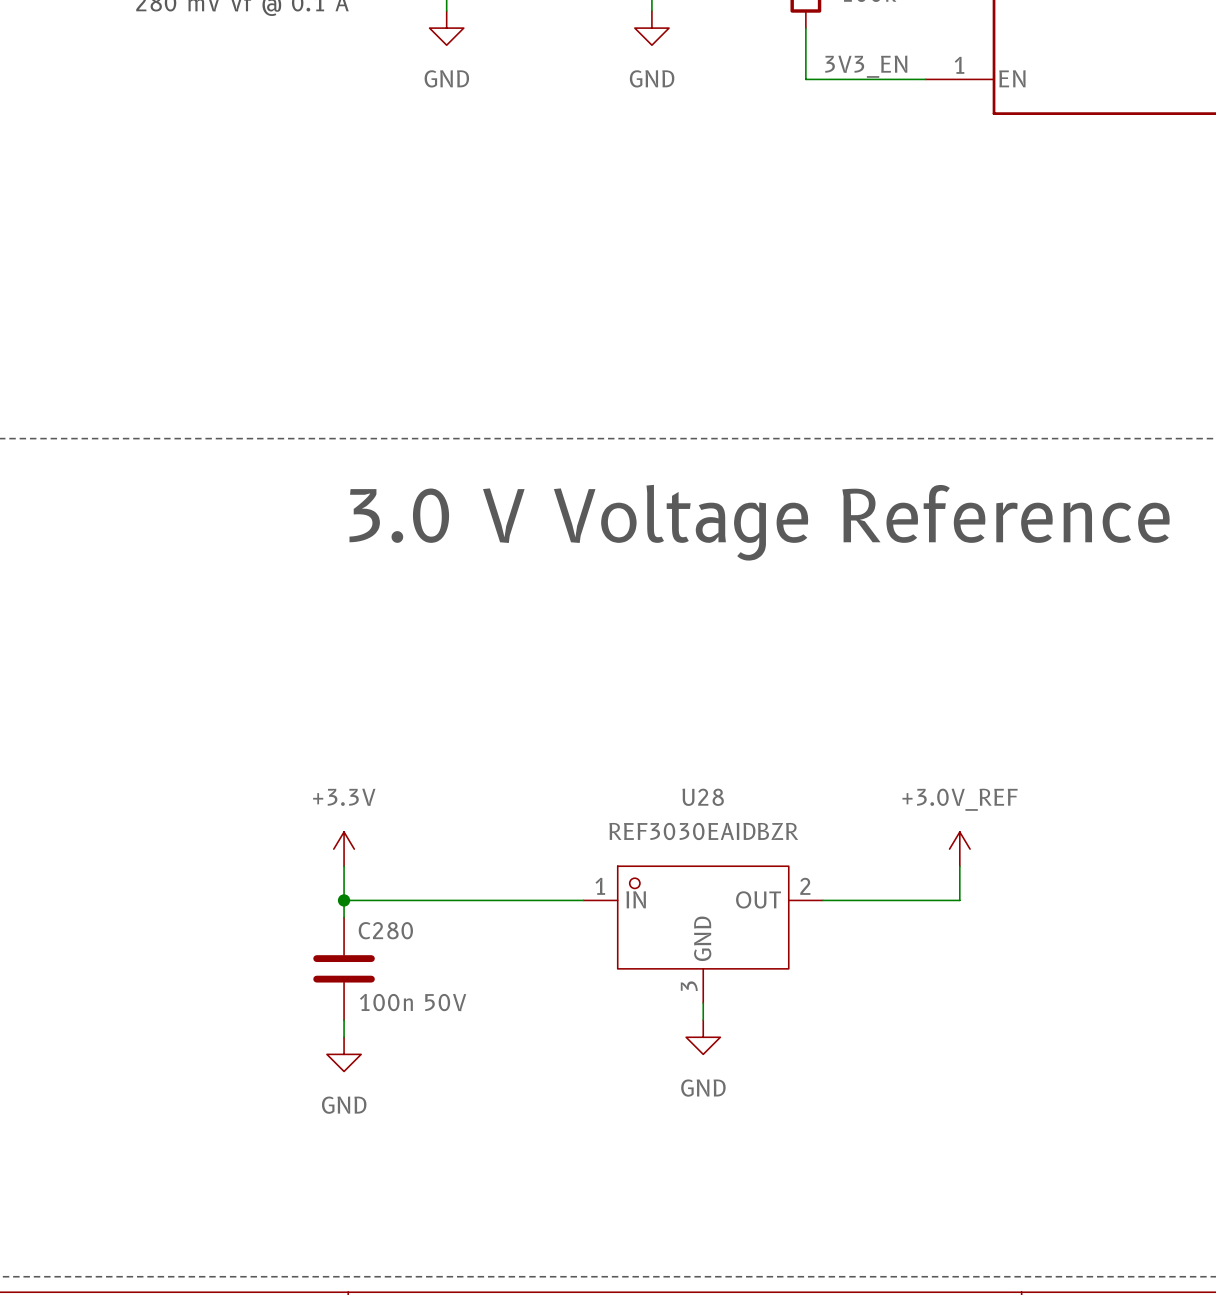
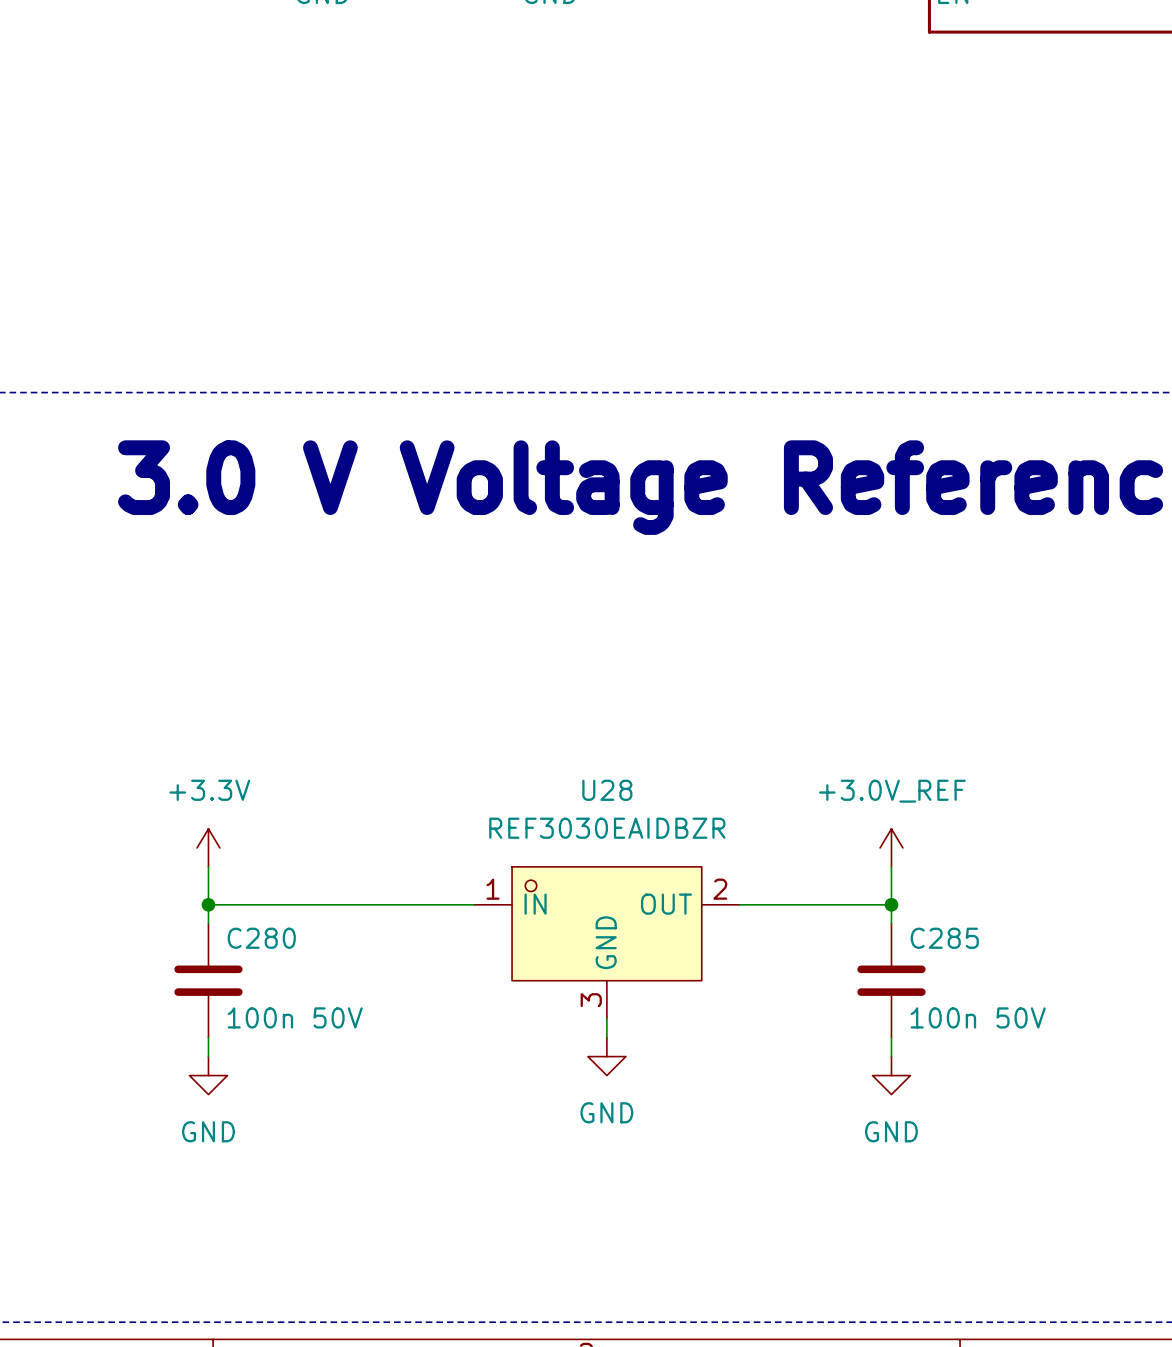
wire: none -> (891, 904) (891, 923)
junction: none -> (891, 904)
C285: none -> 100n 50V (891, 980)
wire: none -> (891, 1037) (891, 1056)
power symbol: none -> GND (891, 1075)

